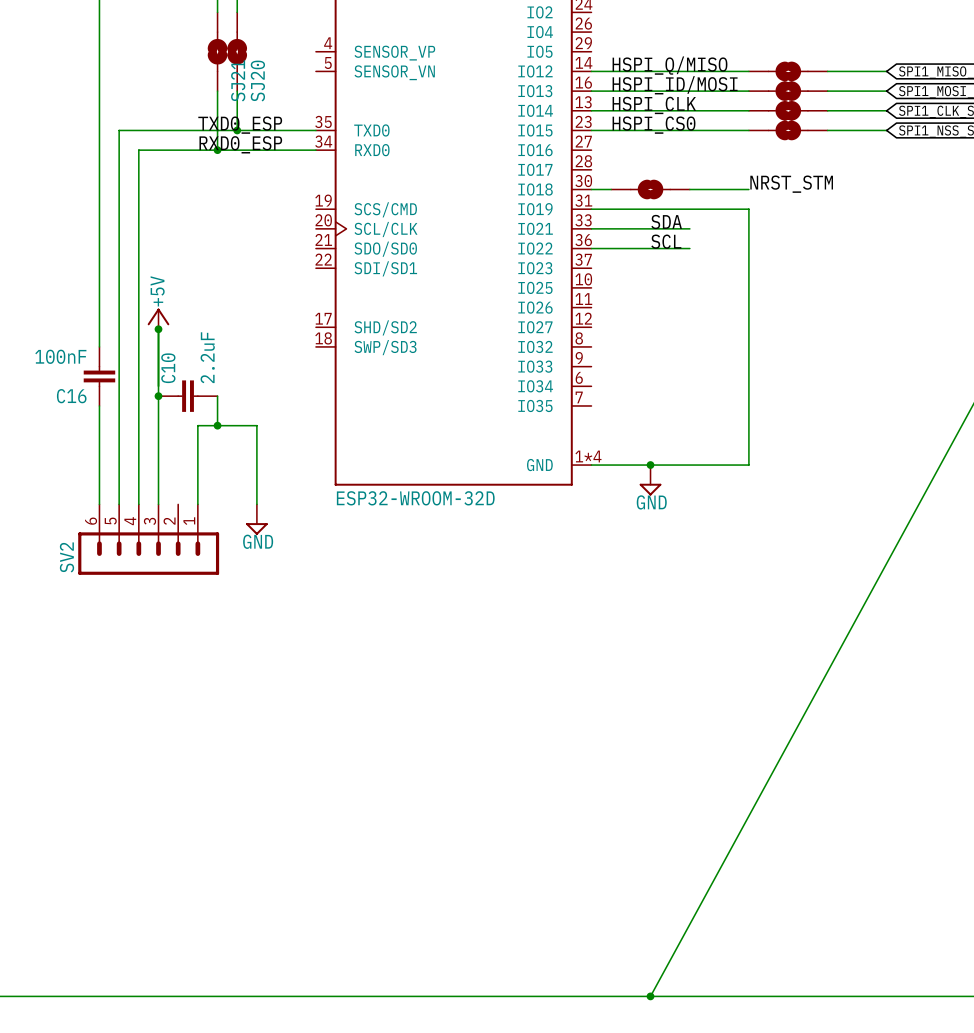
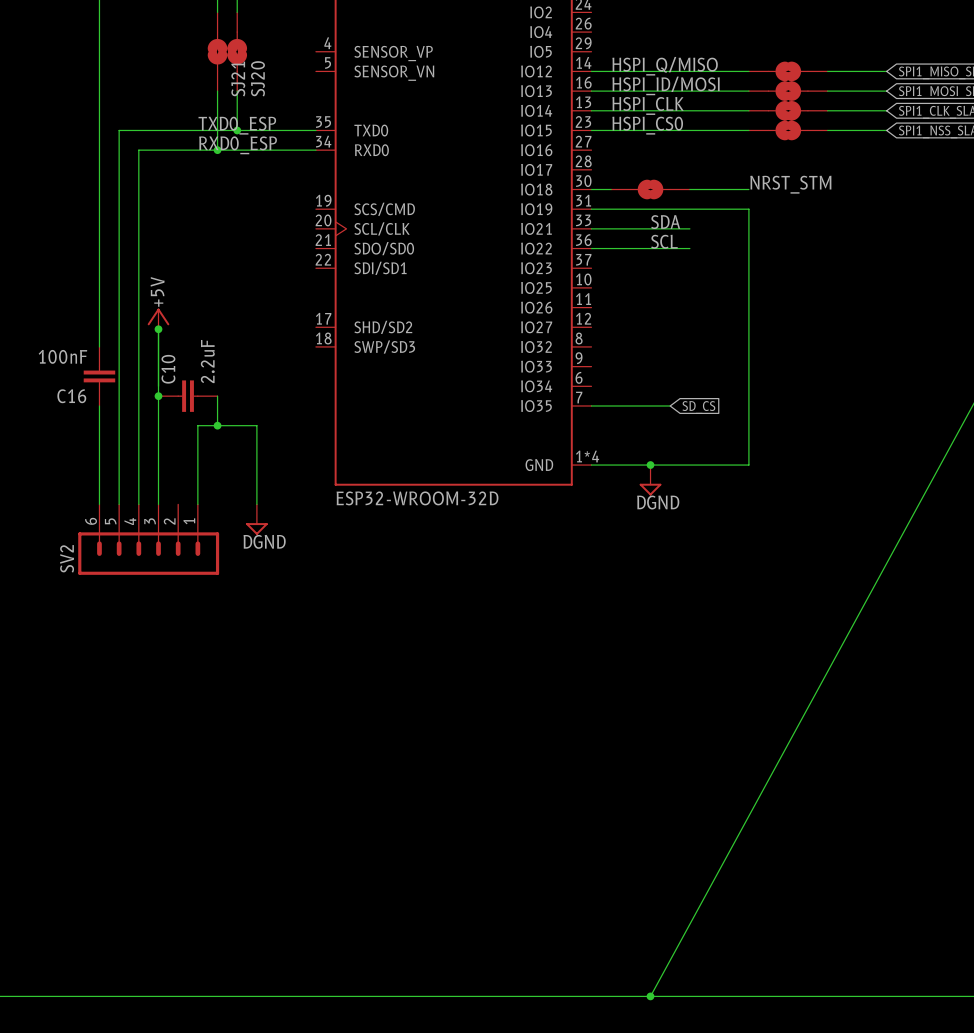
wire: none -> (591, 405) (670, 405)
global label: none -> SD_CS (698, 407)
power symbol: GND (650, 480) -> DGND (650, 480)
power symbol: GND (256, 519) -> DGND (256, 519)

